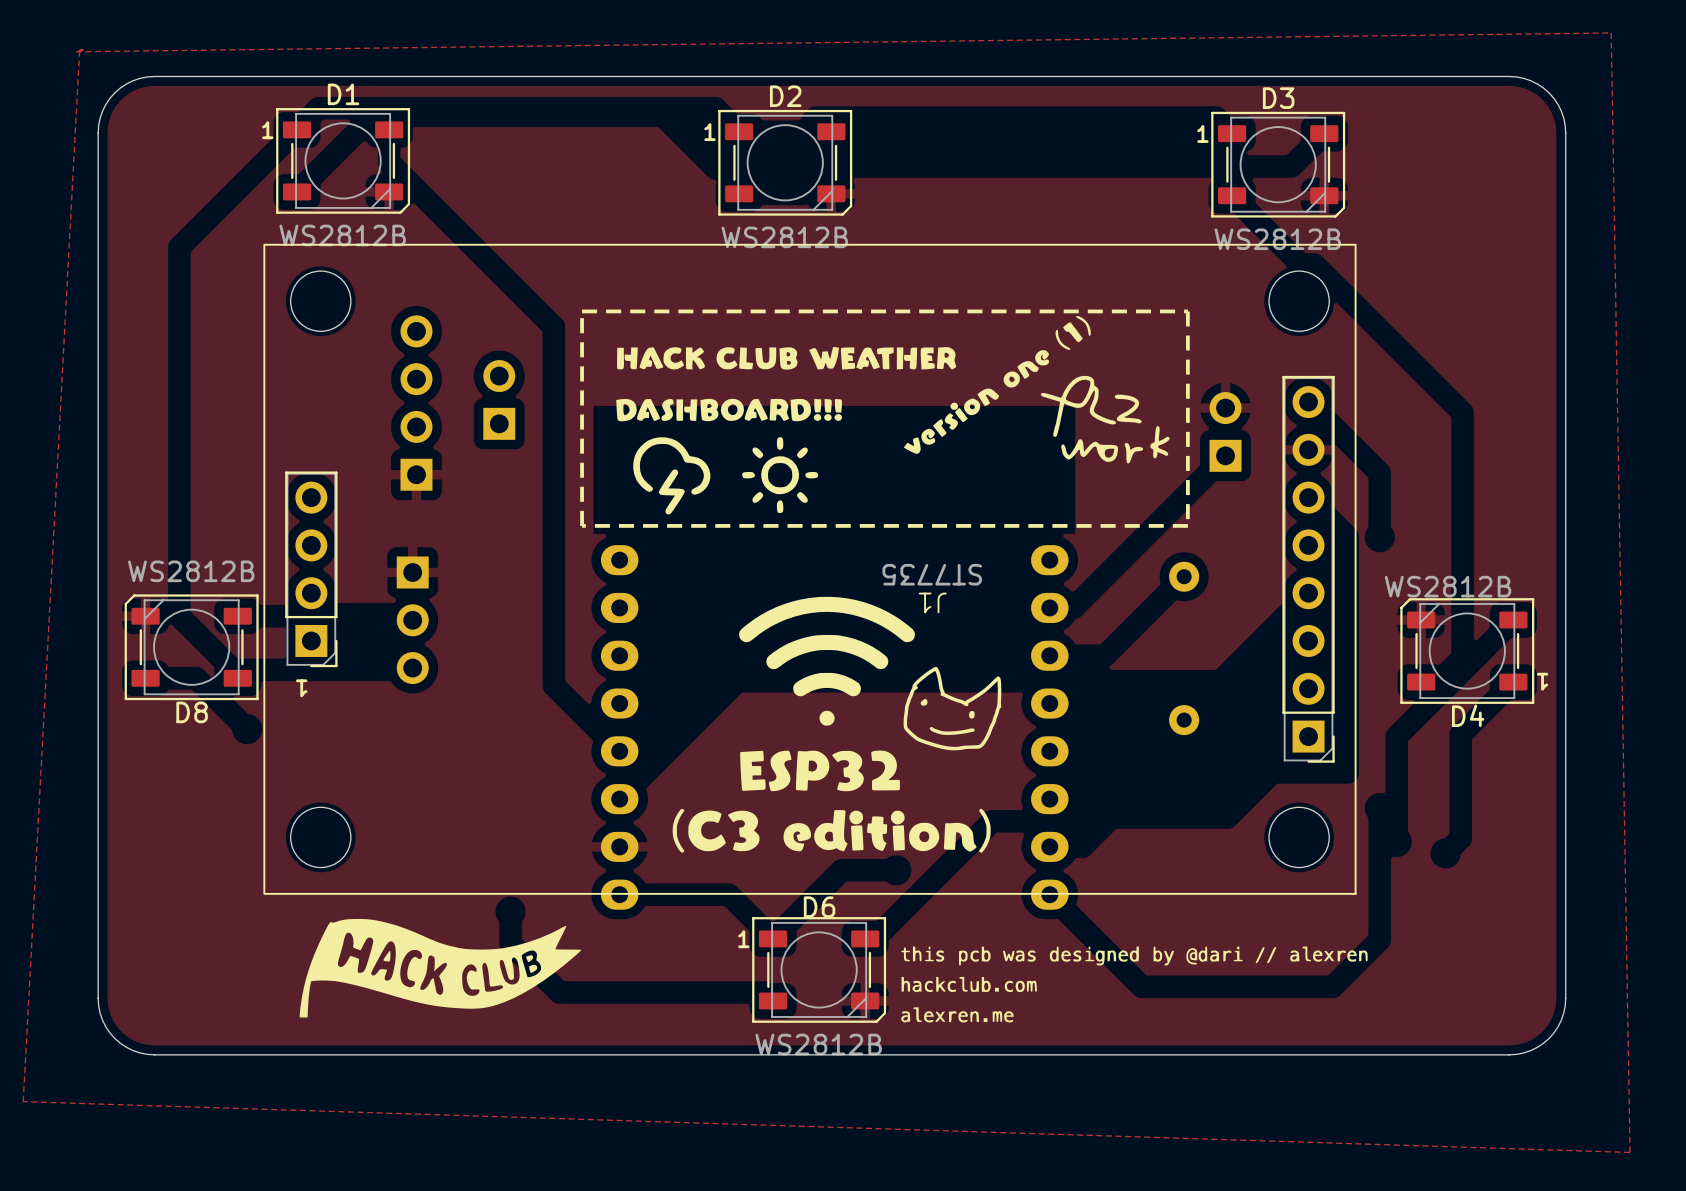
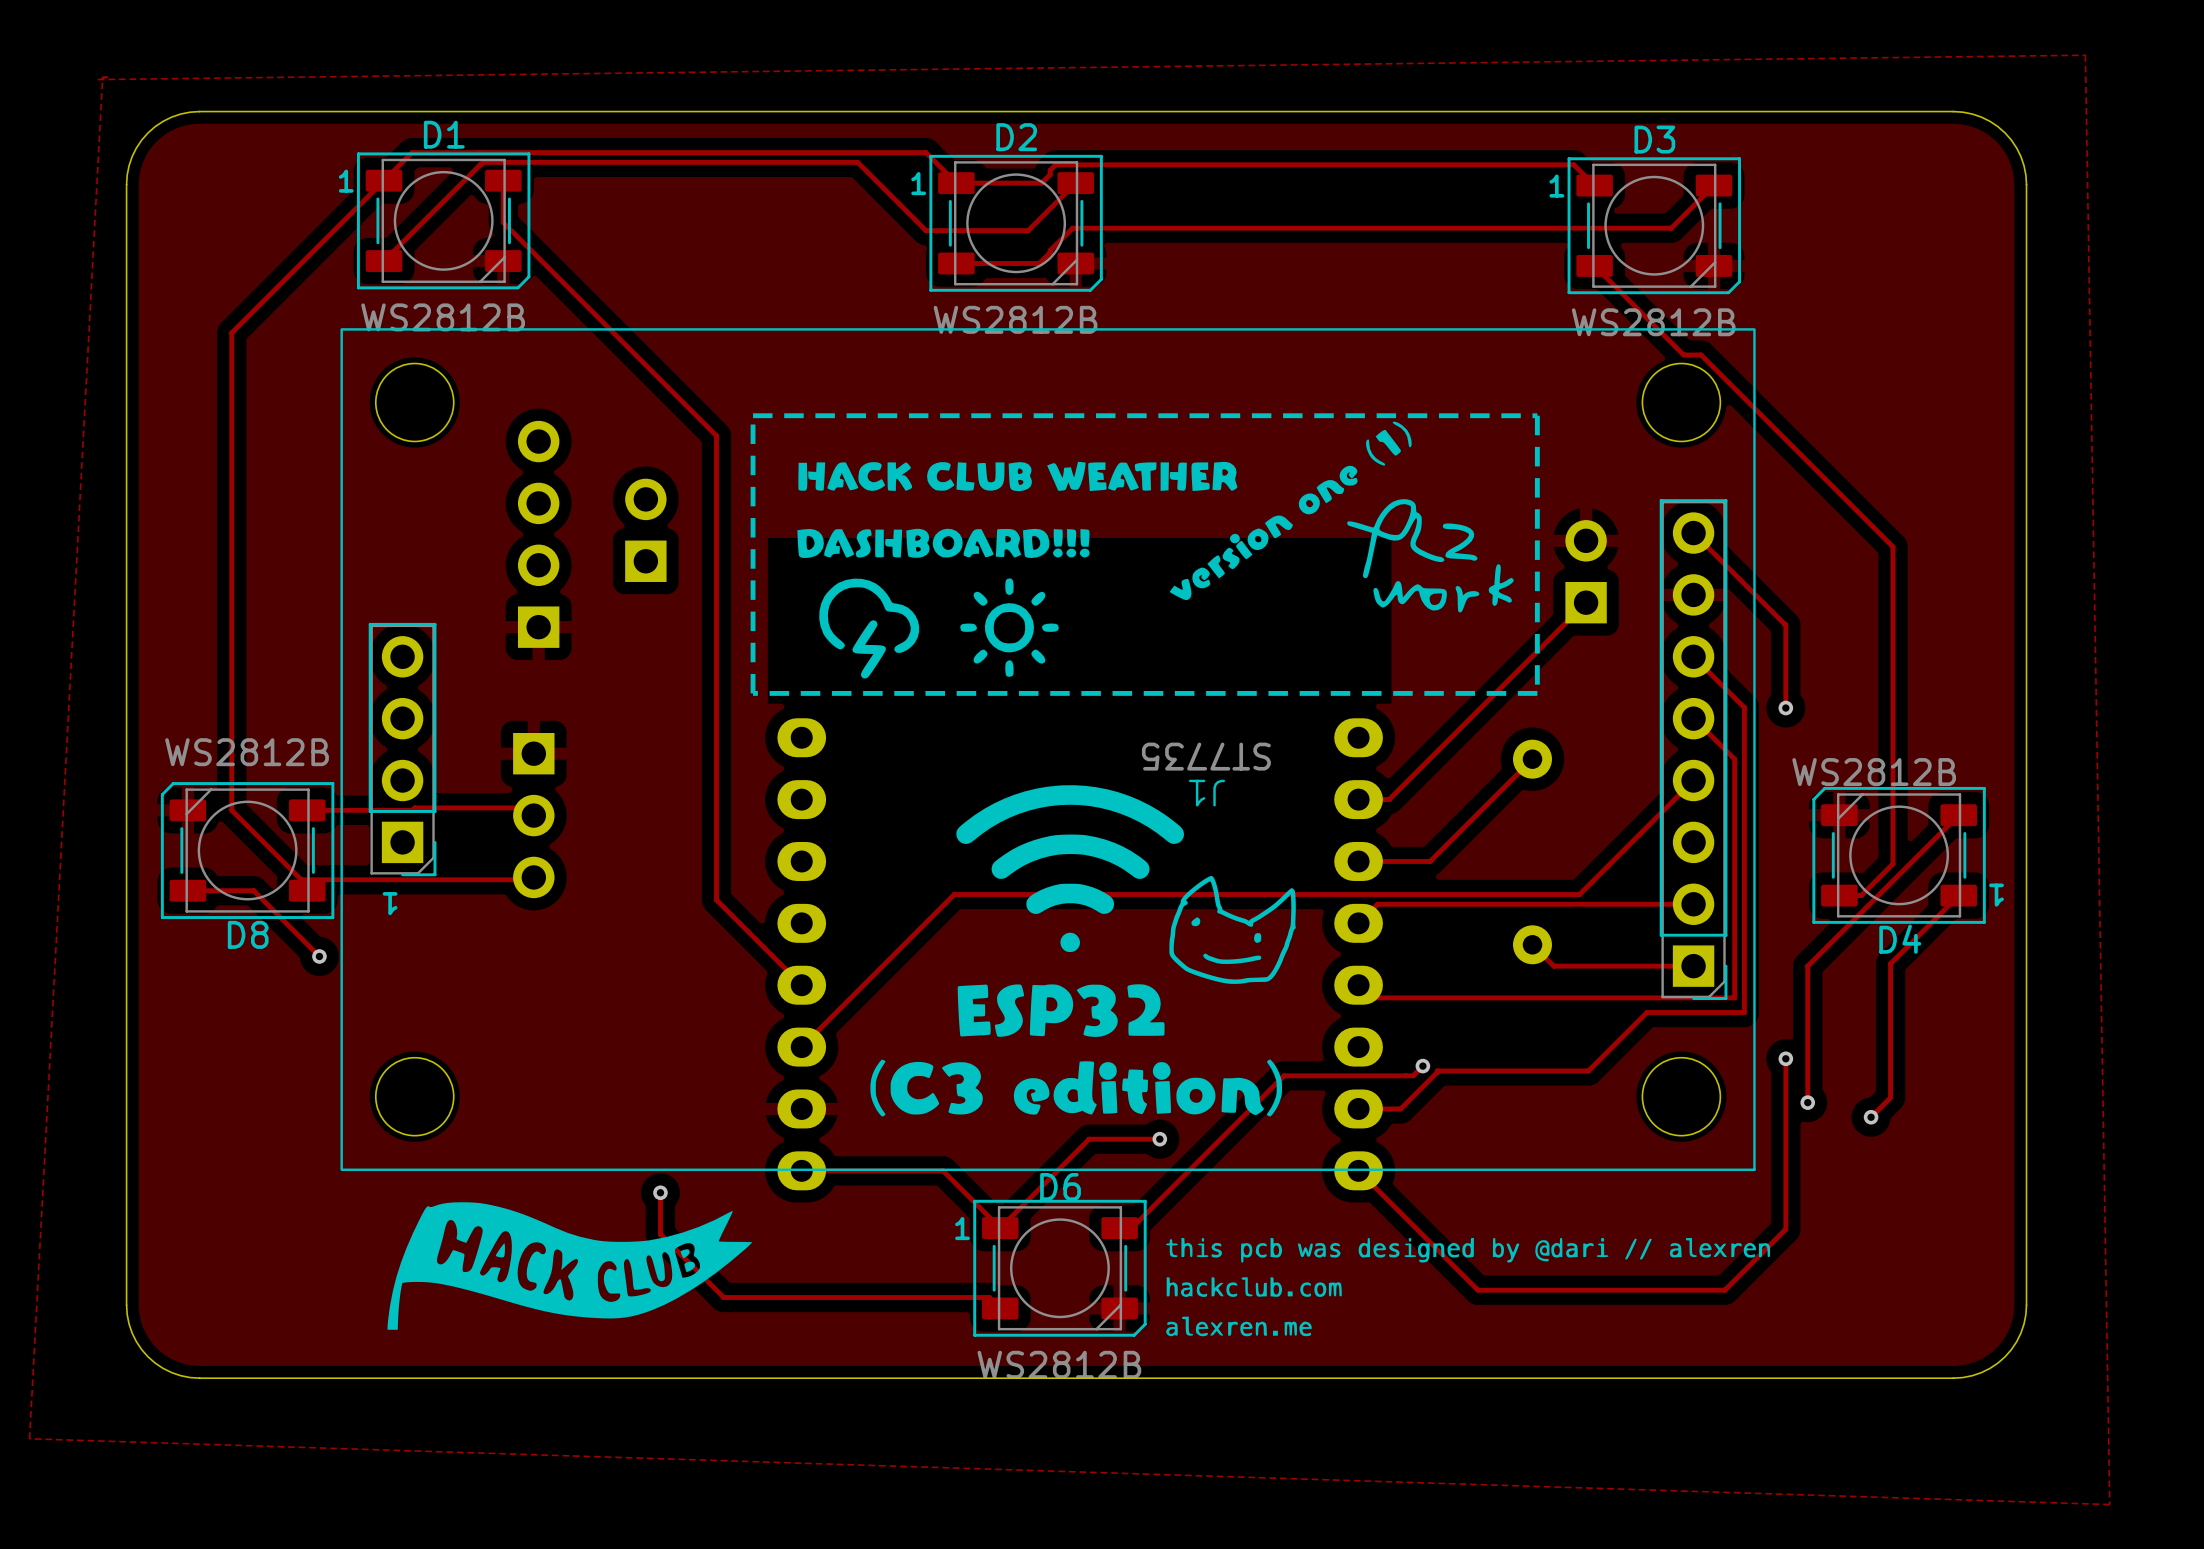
track: none -> (503, 180) (503, 222) (716, 435) (716, 899) (801, 985)
track: none -> (1075, 183) (1028, 230) (925, 230) (857, 162) (483, 162) (384, 261)
track: none -> (1594, 185) (1573, 164) (1055, 164) (1050, 170) (1050, 174) (1041, 183) (956, 183) (925, 152) (412, 152) (231, 332) (231, 810) (301, 879) (531, 879) (533, 877)
track: none -> (1713, 185) (1671, 228) (1072, 228) (1039, 263) (956, 263)
track: none -> (1594, 265) (1683, 354) (1701, 354) (1893, 546) (1893, 863) (1861, 895) (1839, 895)
track: none -> (1693, 533) (1785, 625) (1785, 707)
track: none -> (1586, 602) (1389, 799) (1358, 799)
track: none -> (1693, 656) (1744, 707) (1744, 1012) (1646, 1012) (1588, 1070) (1437, 1070) (1400, 1108) (1358, 1108)
via: none -> (1785, 708)
track: none -> (1693, 718) (1734, 759) (1734, 997) (1371, 997) (1358, 985)
track: none -> (1532, 759) (1430, 861) (1358, 861)
track: none -> (1693, 780) (1579, 894) (954, 894) (801, 1047)
track: none -> (307, 810) (526, 807) (533, 815)
track: none -> (1958, 815) (1807, 966) (1807, 1102)
track: none -> (187, 890) (253, 890) (319, 956)
track: none -> (1958, 895) (1890, 963) (1890, 1097) (1871, 1117)
track: none -> (1693, 904) (1377, 904) (1358, 923)
track: none -> (1532, 944) (1553, 966) (1693, 966)
via: none -> (319, 956)
track: none -> (1785, 1058) (1785, 1229) (1724, 1290) (1477, 1290) (1358, 1170)
via: none -> (1785, 1058)
track: none -> (1422, 1066) (1413, 1075) (1284, 1075) (1135, 1224) (1123, 1224) (1119, 1228)
via: none -> (1422, 1066)
via: none -> (1807, 1102)
via: none -> (1871, 1117)
track: none -> (1159, 1139) (1089, 1139) (1000, 1228) (943, 1170) (801, 1170)
via: none -> (1159, 1139)
track: none -> (660, 1192) (660, 1234) (723, 1297) (989, 1297) (1000, 1308)
via: none -> (660, 1192)

